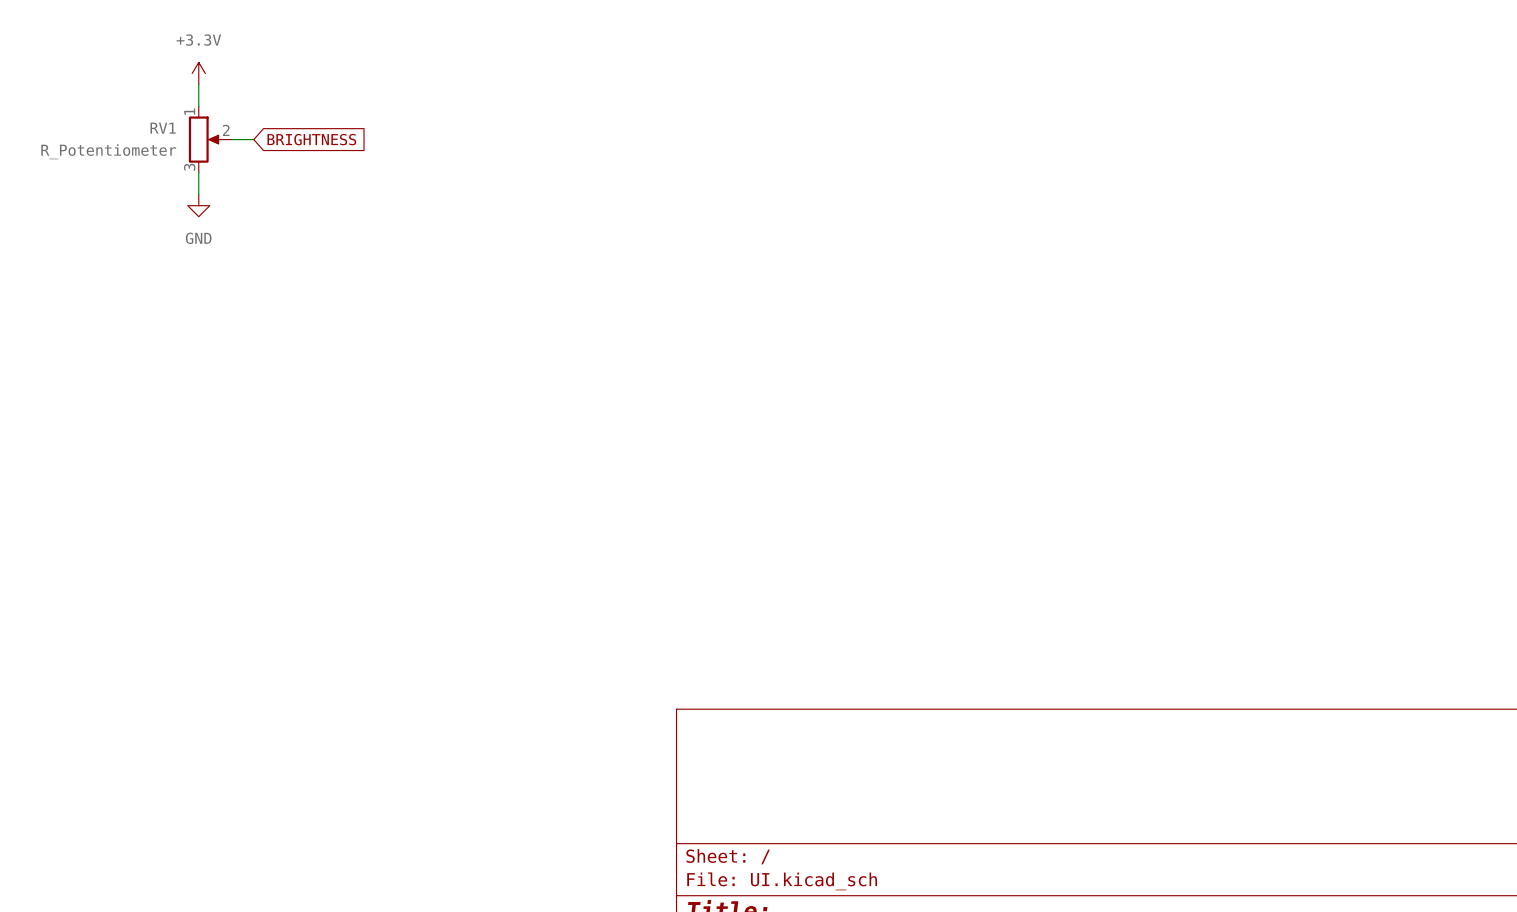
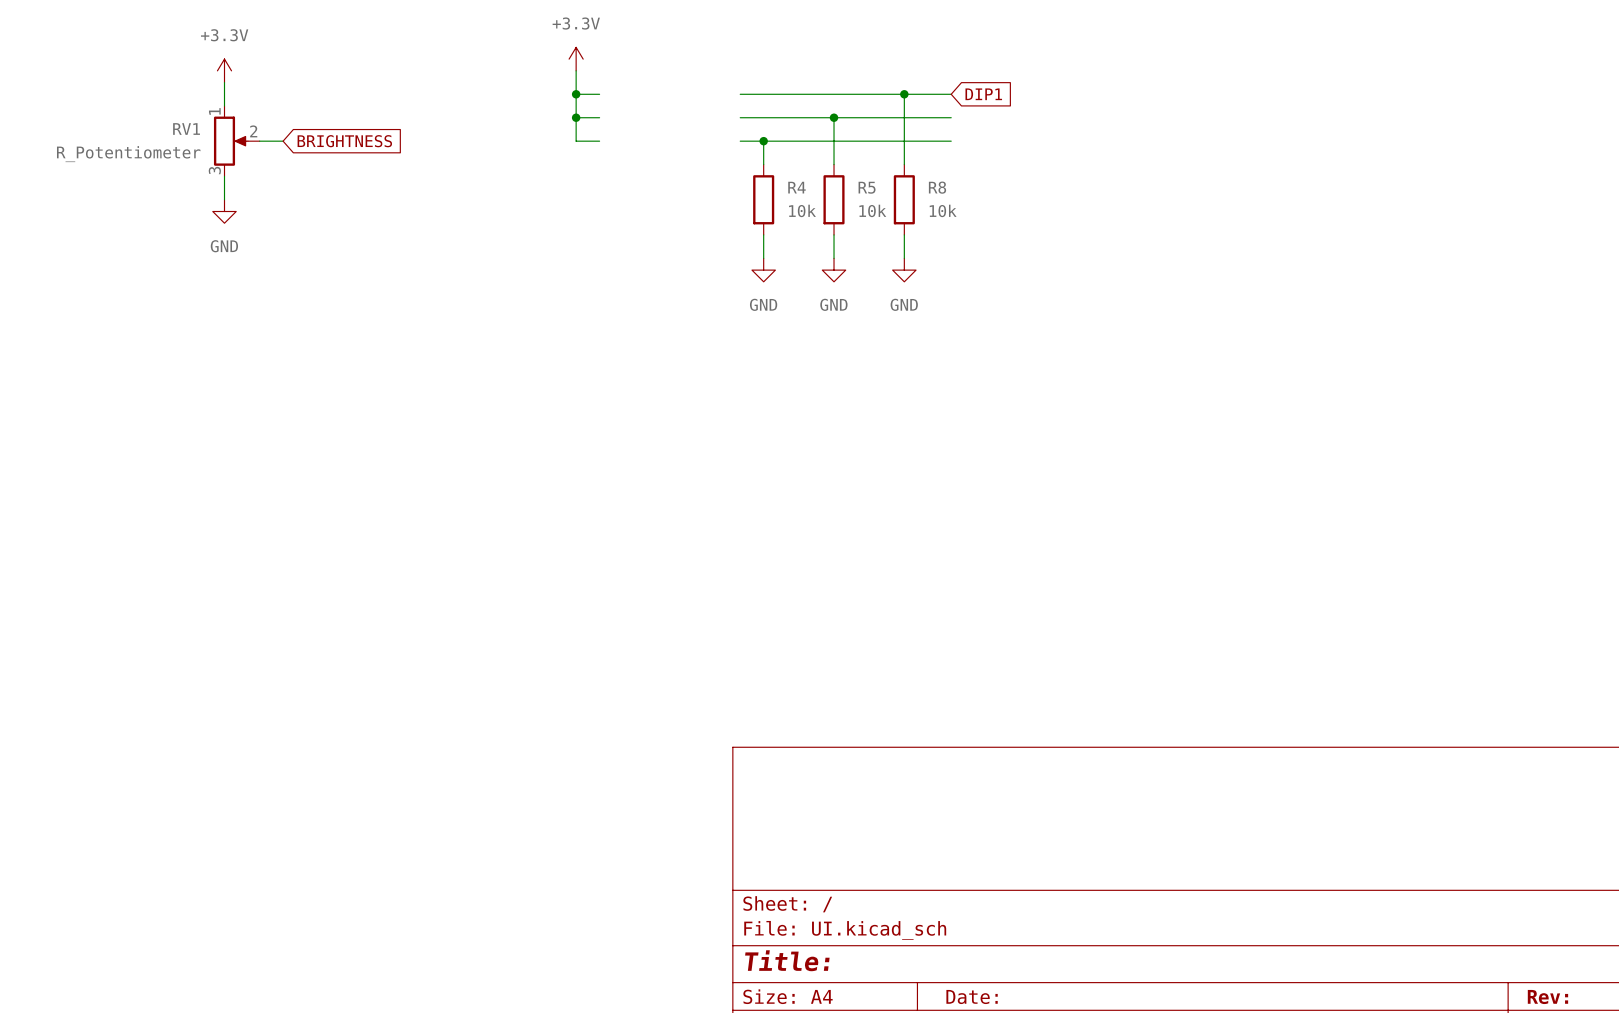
power symbol: none -> +3.3V (576, 59)
wire: none -> (576, 70) (576, 141) (599, 141)
wire: none -> (576, 94) (599, 94)
junction: none -> (576, 94)
wire: none -> (740, 94) (951, 94)
wire: none -> (904, 94) (904, 164)
junction: none -> (904, 94)
global label: none -> DIP1 (983, 94)
wire: none -> (576, 117) (599, 117)
junction: none -> (576, 117)
wire: none -> (740, 117) (951, 117)
wire: none -> (834, 117) (834, 164)
junction: none -> (834, 117)
wire: none -> (740, 141) (951, 141)
wire: none -> (763, 141) (763, 164)
junction: none -> (763, 141)
R4: none -> 10k (763, 199)
R5: none -> 10k (834, 199)
R8: none -> 10k (904, 199)
wire: none -> (763, 234) (763, 258)
wire: none -> (834, 234) (834, 258)
wire: none -> (904, 234) (904, 258)
power symbol: none -> GND (763, 270)
power symbol: none -> GND (834, 270)
power symbol: none -> GND (904, 270)

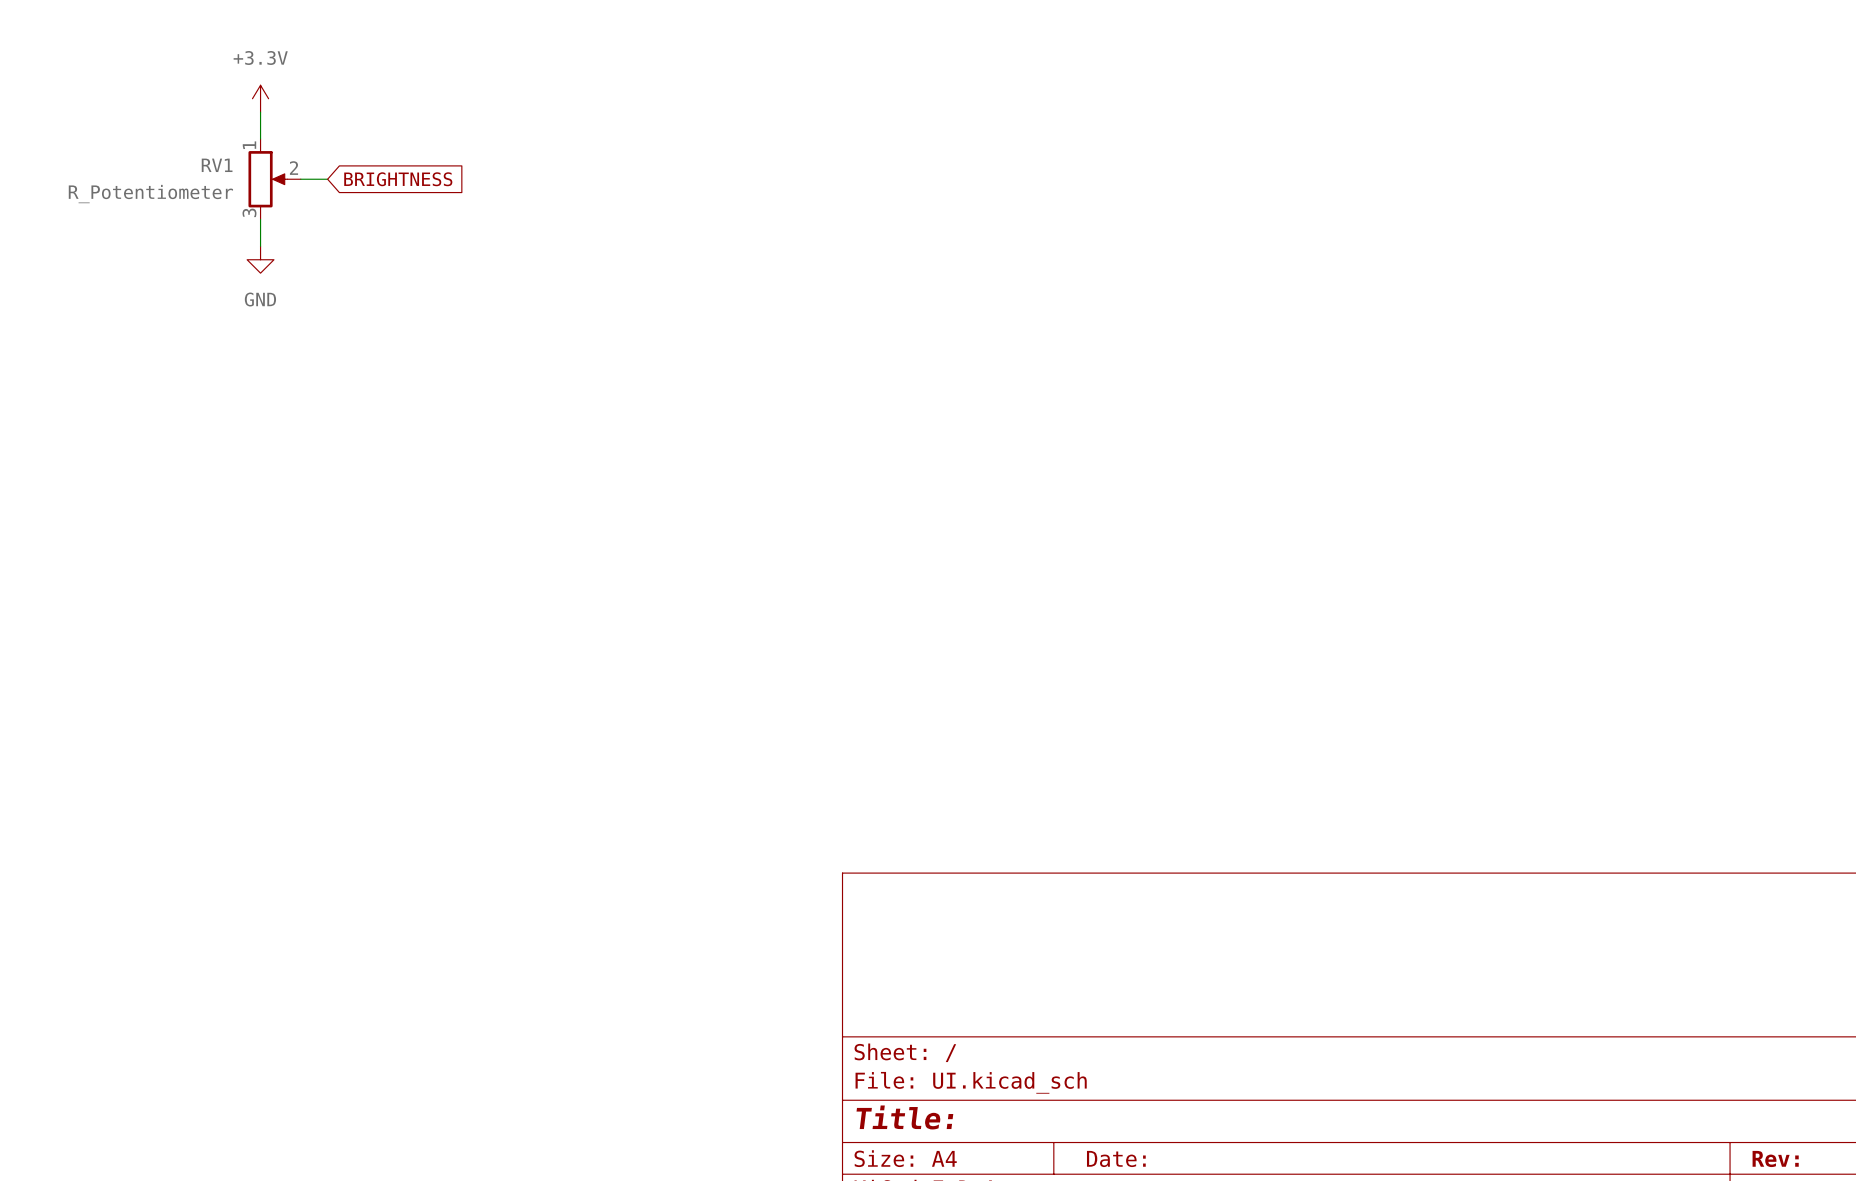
power symbol: +3.3V (576, 59) -> none
wire: (576, 70) (576, 141) (599, 141) -> none
wire: (576, 94) (599, 94) -> none
junction: (576, 94) -> none
wire: (740, 94) (951, 94) -> none
wire: (904, 94) (904, 164) -> none
junction: (904, 94) -> none
global label: DIP1 (983, 94) -> none
wire: (576, 117) (599, 117) -> none
junction: (576, 117) -> none
wire: (740, 117) (951, 117) -> none
wire: (834, 117) (834, 164) -> none
junction: (834, 117) -> none
wire: (740, 141) (951, 141) -> none
wire: (763, 141) (763, 164) -> none
junction: (763, 141) -> none
R4: 10k (763, 199) -> none
R5: 10k (834, 199) -> none
R8: 10k (904, 199) -> none
wire: (763, 234) (763, 258) -> none
wire: (834, 234) (834, 258) -> none
wire: (904, 234) (904, 258) -> none
power symbol: GND (763, 270) -> none
power symbol: GND (834, 270) -> none
power symbol: GND (904, 270) -> none

